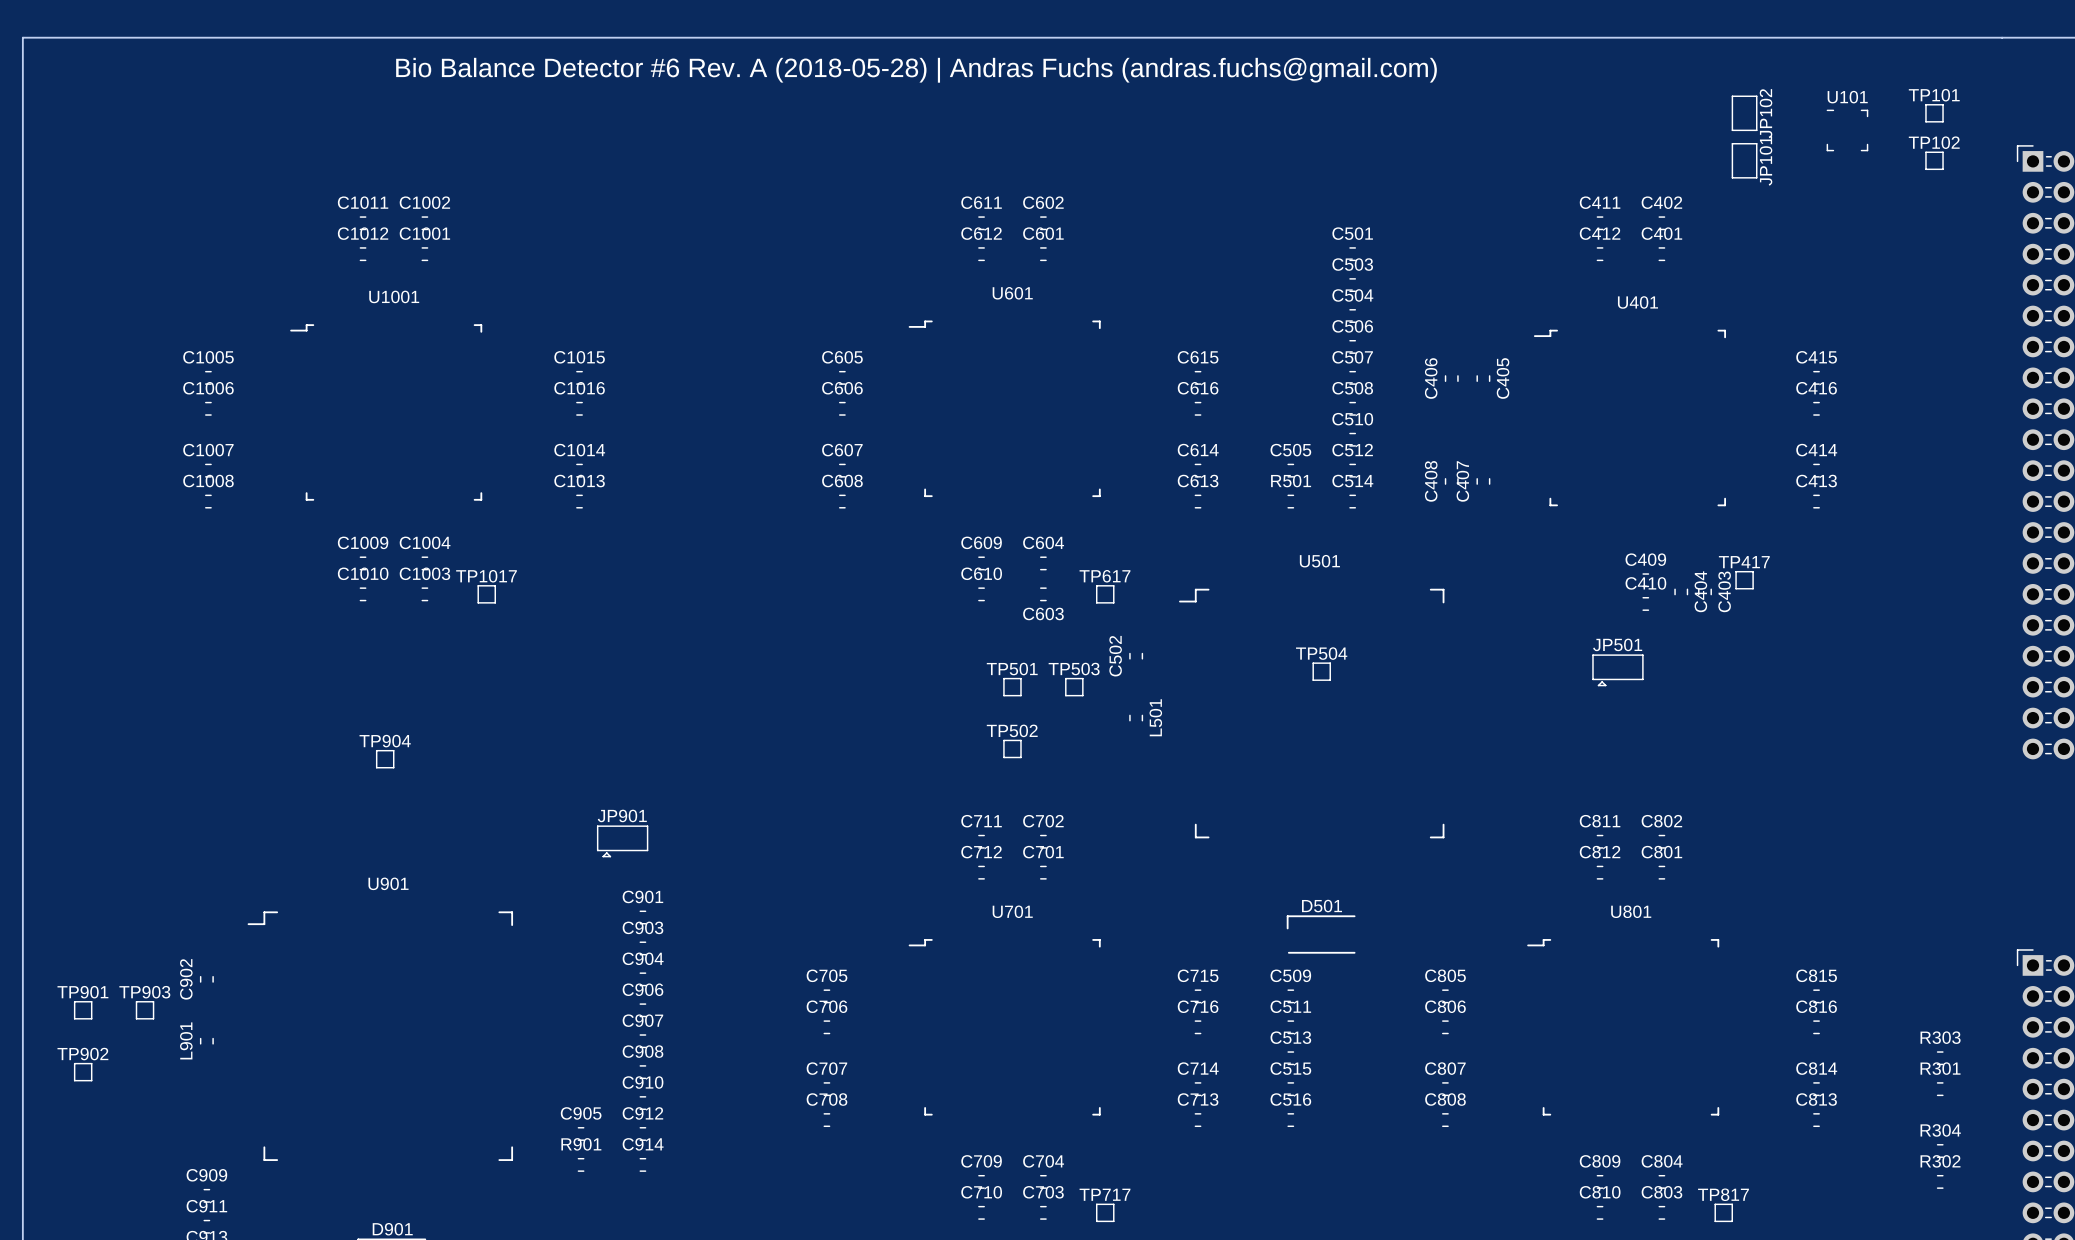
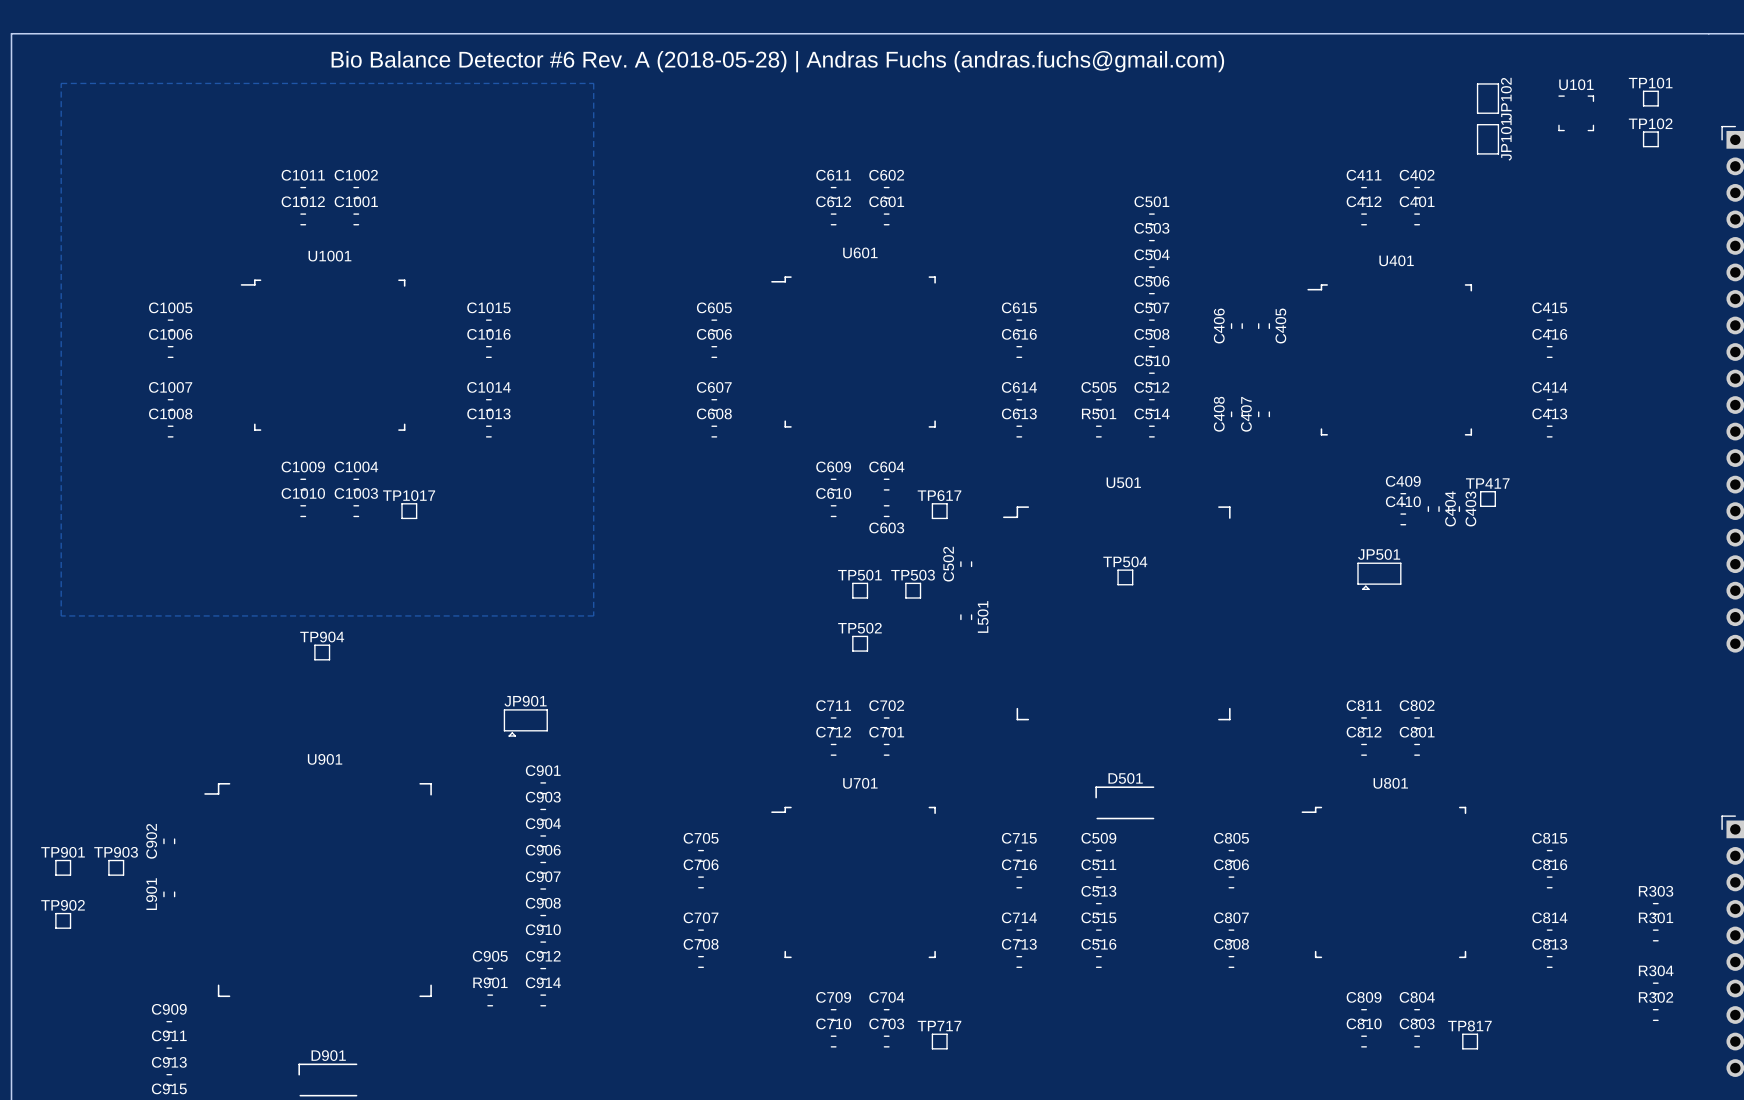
zone outline: none -> (61, 83) (61, 615) (593, 615) (593, 83) (61, 83)

